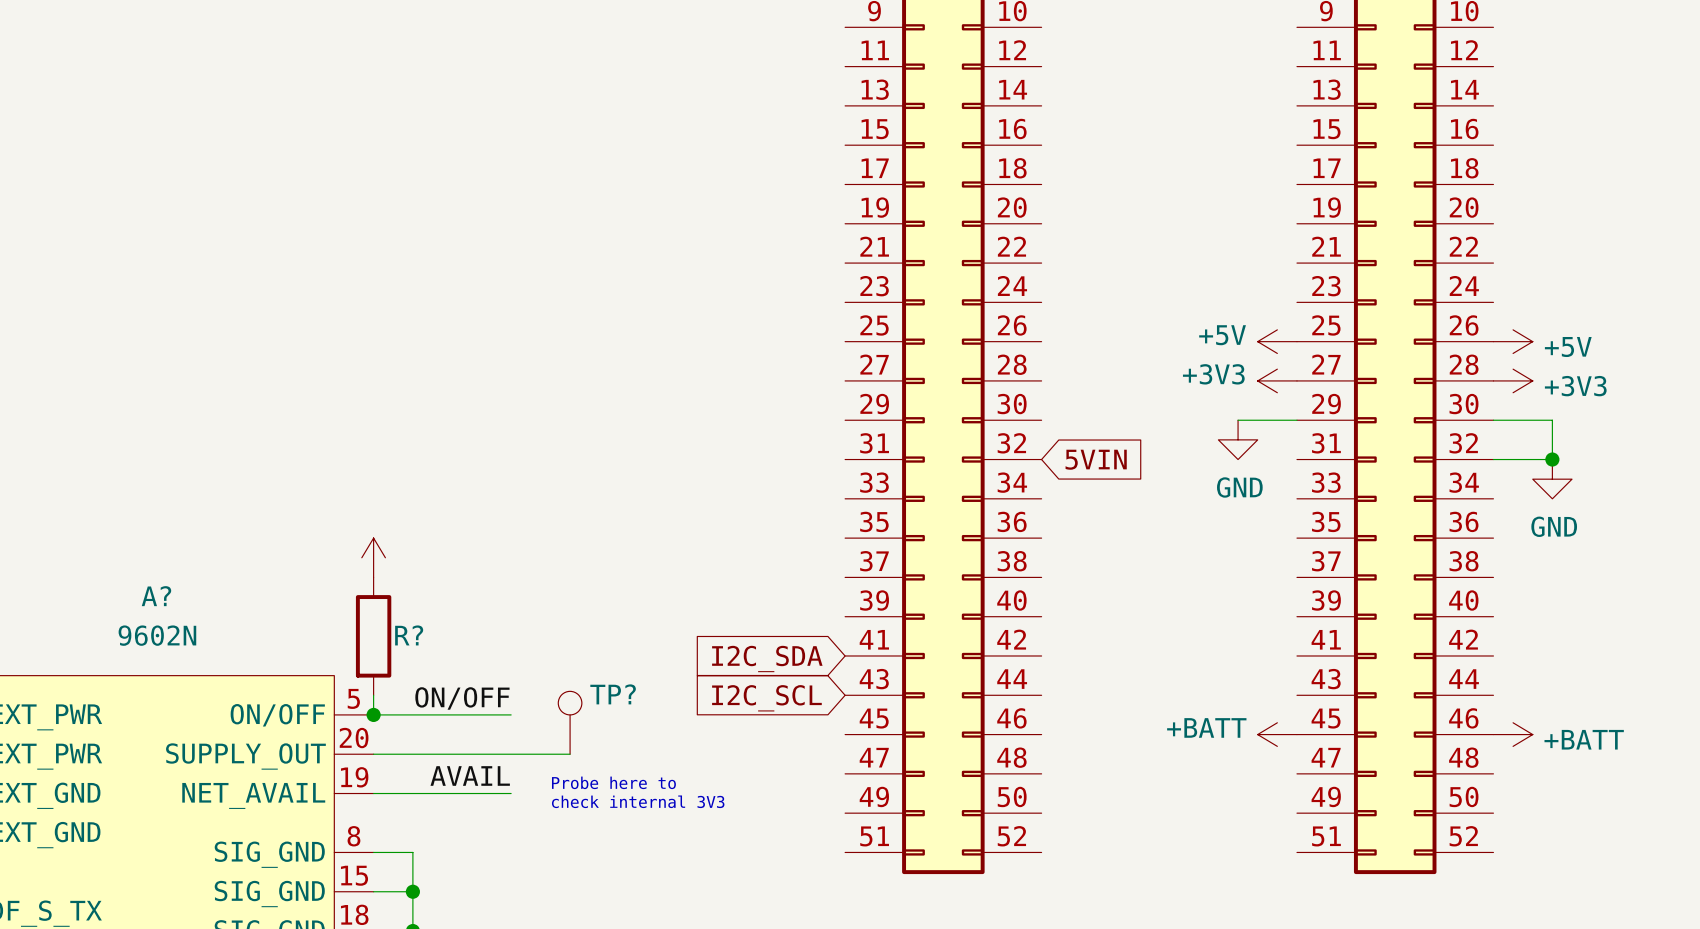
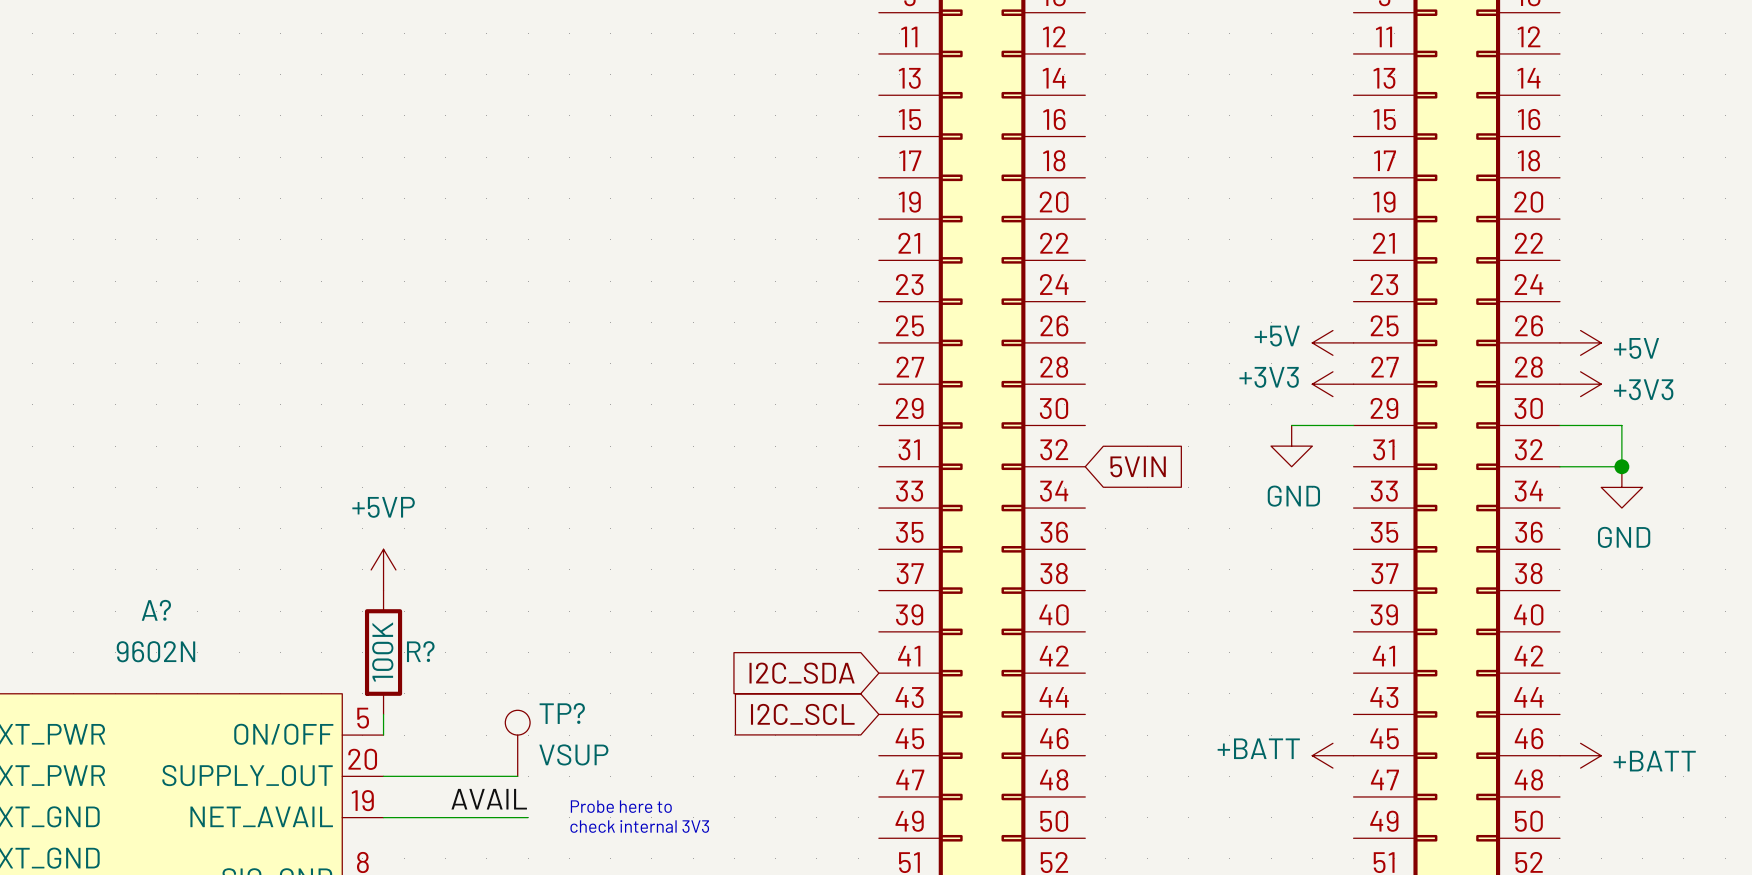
power symbol text: none -> +5VP (383, 507)
R? value: none -> 100K (382, 652)
label: ON/OFF (462, 698) -> none
wire: (373, 714) (511, 714) -> none
junction: (373, 714) -> none
TP?: none -> VSUP (517, 743)
TP?: (570, 722) -> none
wire: (501, 754) (570, 754) -> none

